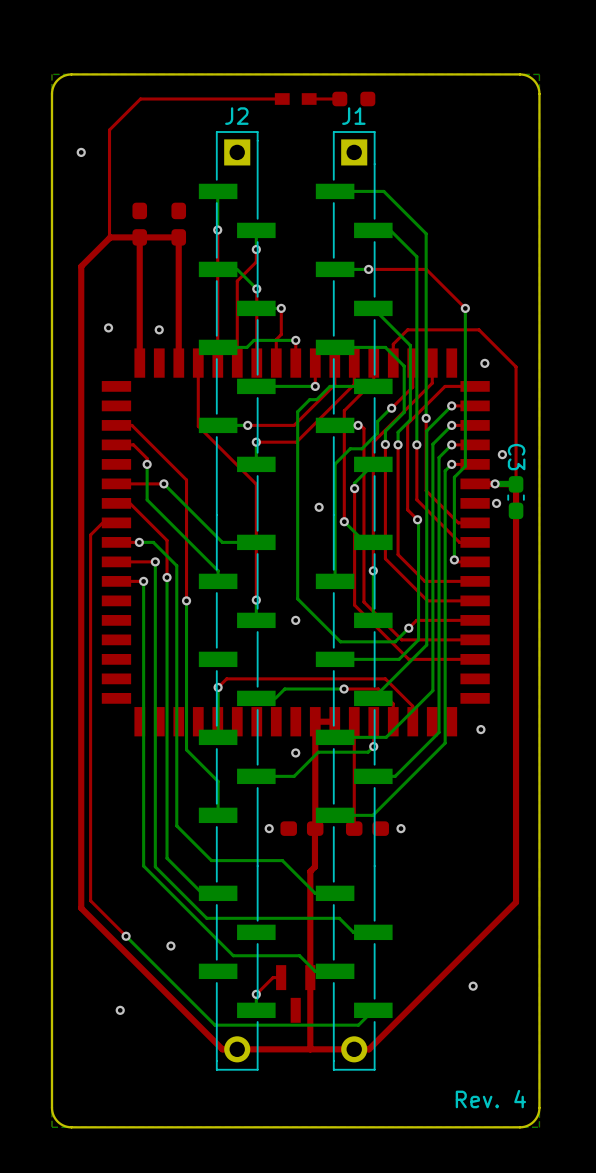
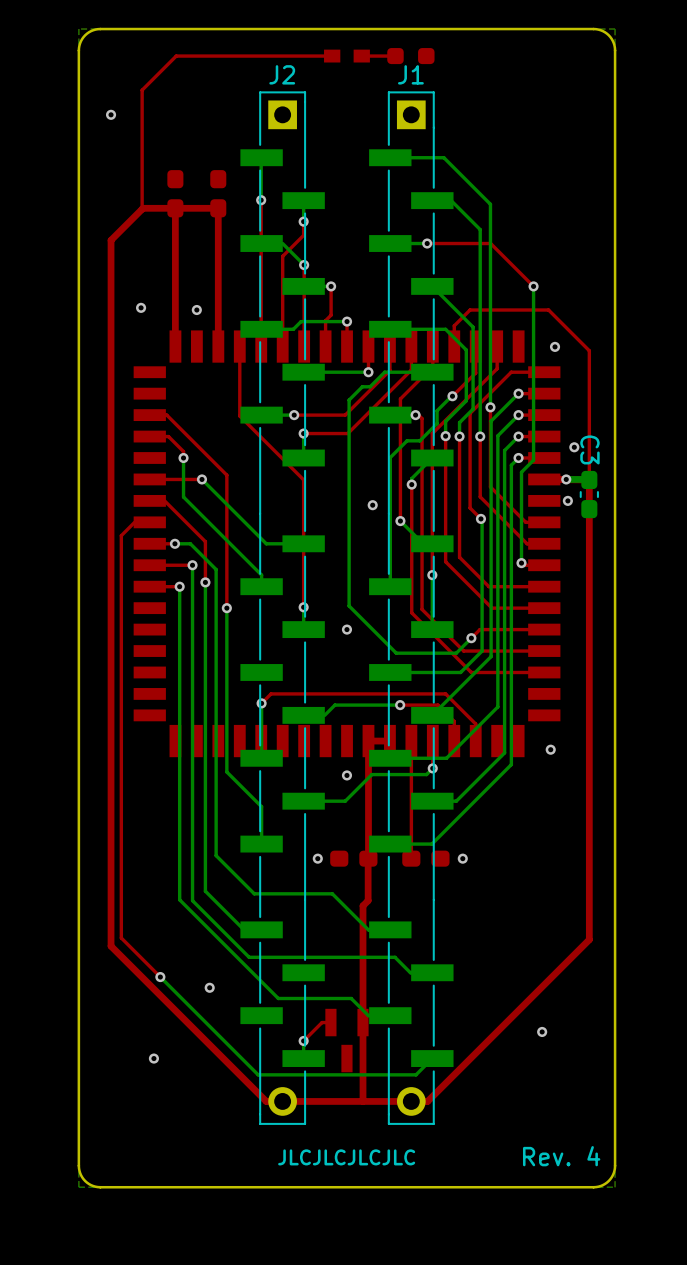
text: none -> JLCJLCJLCJLC (346, 1157)

